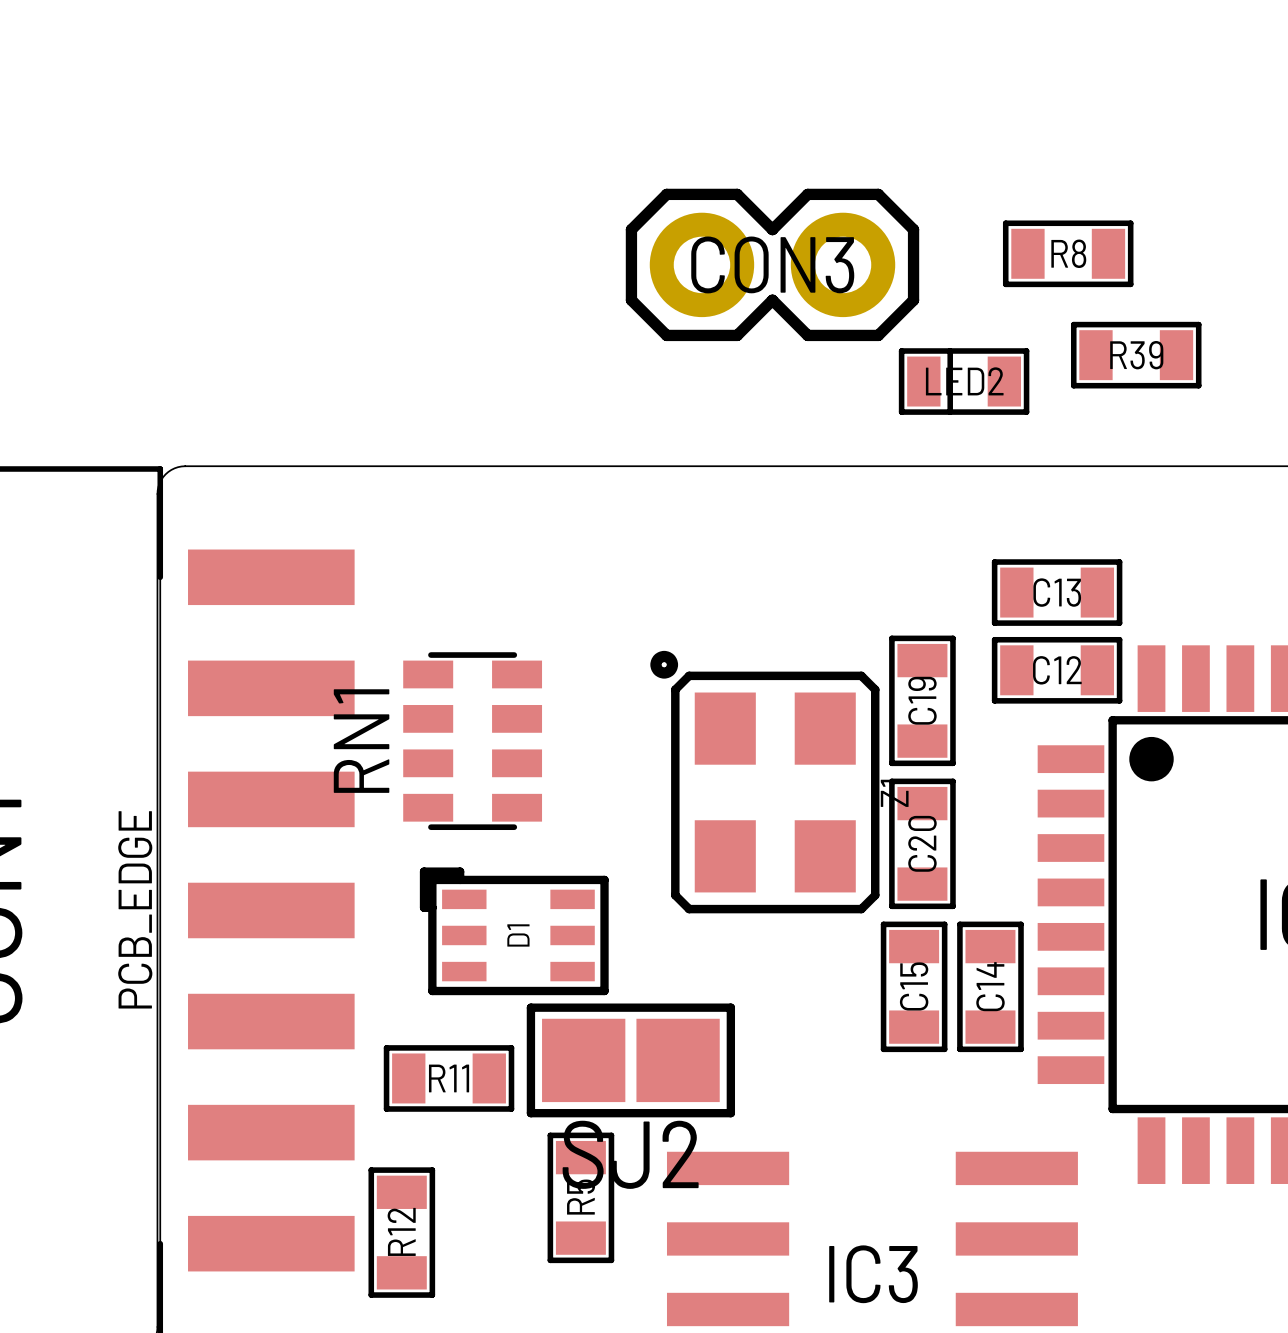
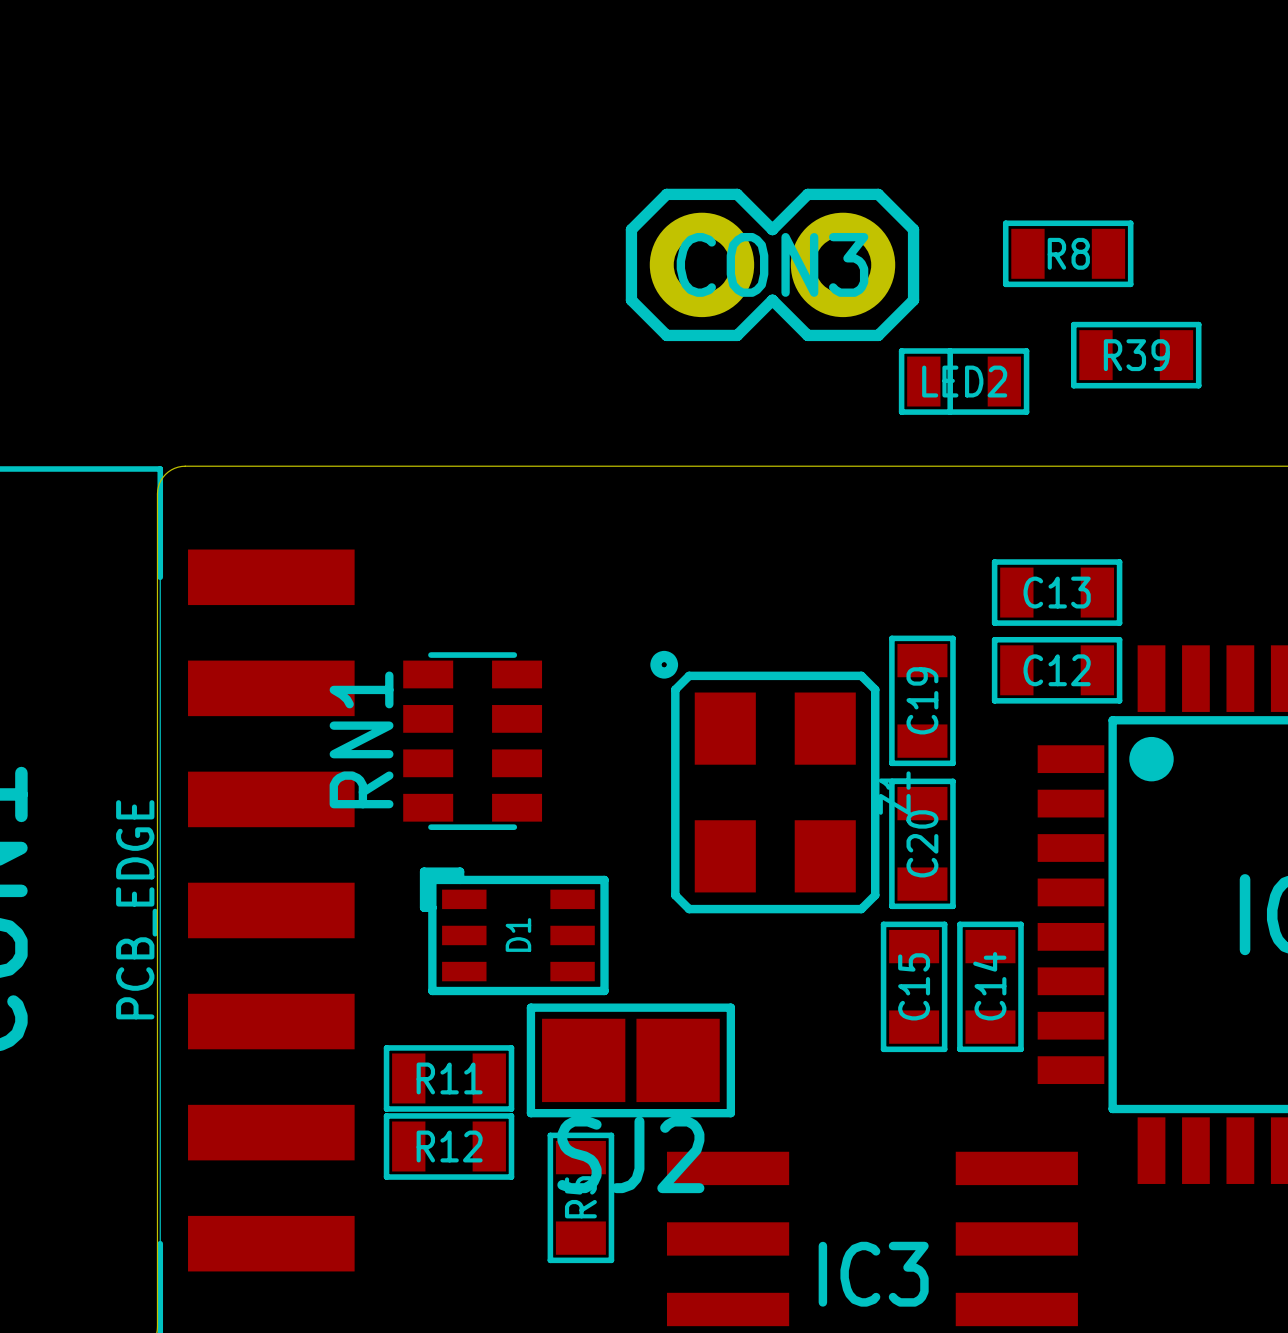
R12 rotation: 0° (401, 1232) -> 90° clockwise (449, 1146)
R12 position: (401, 1232) -> (449, 1146)

